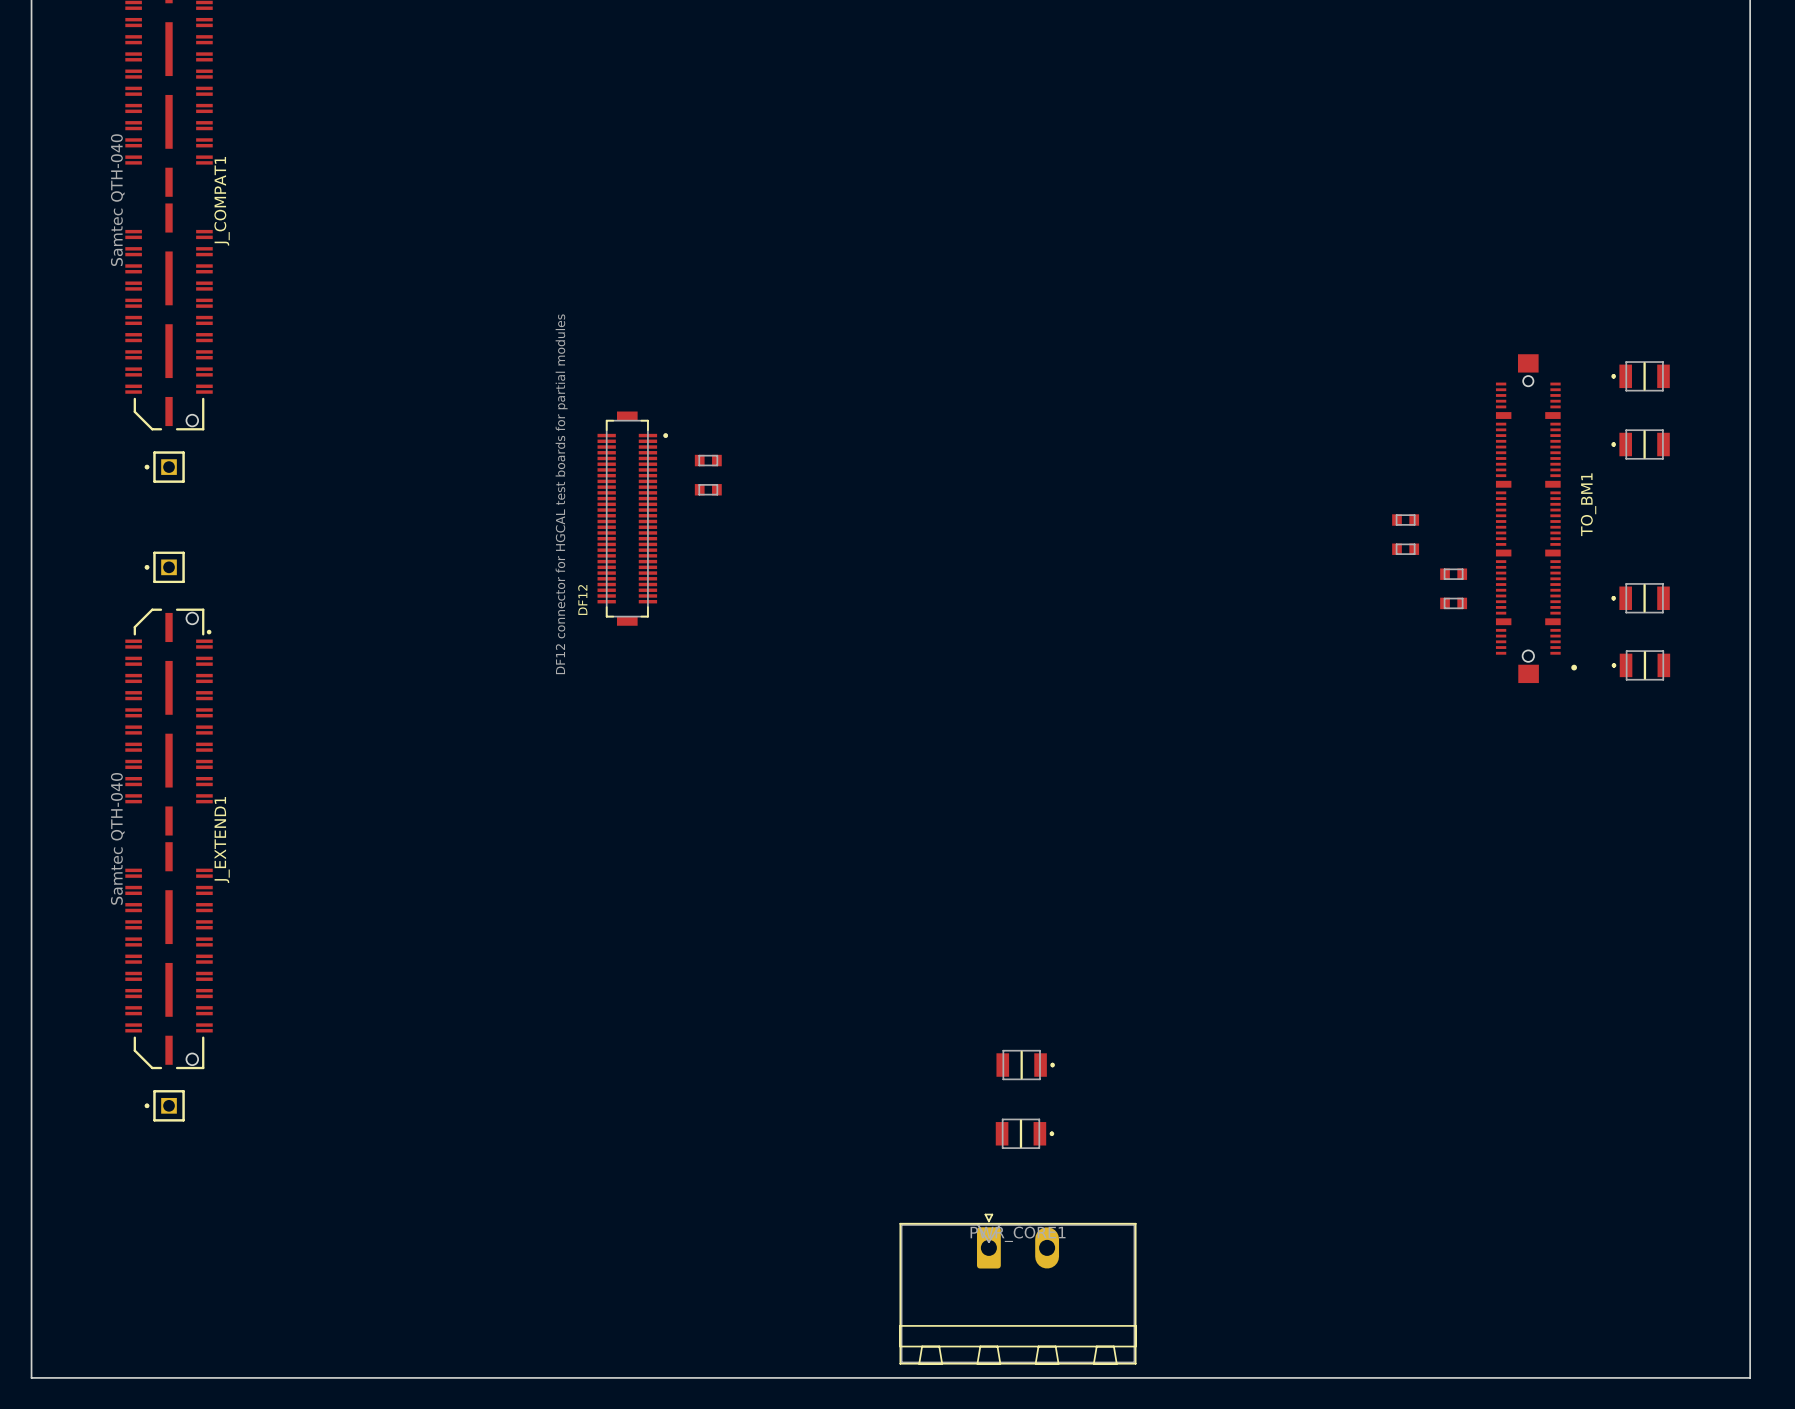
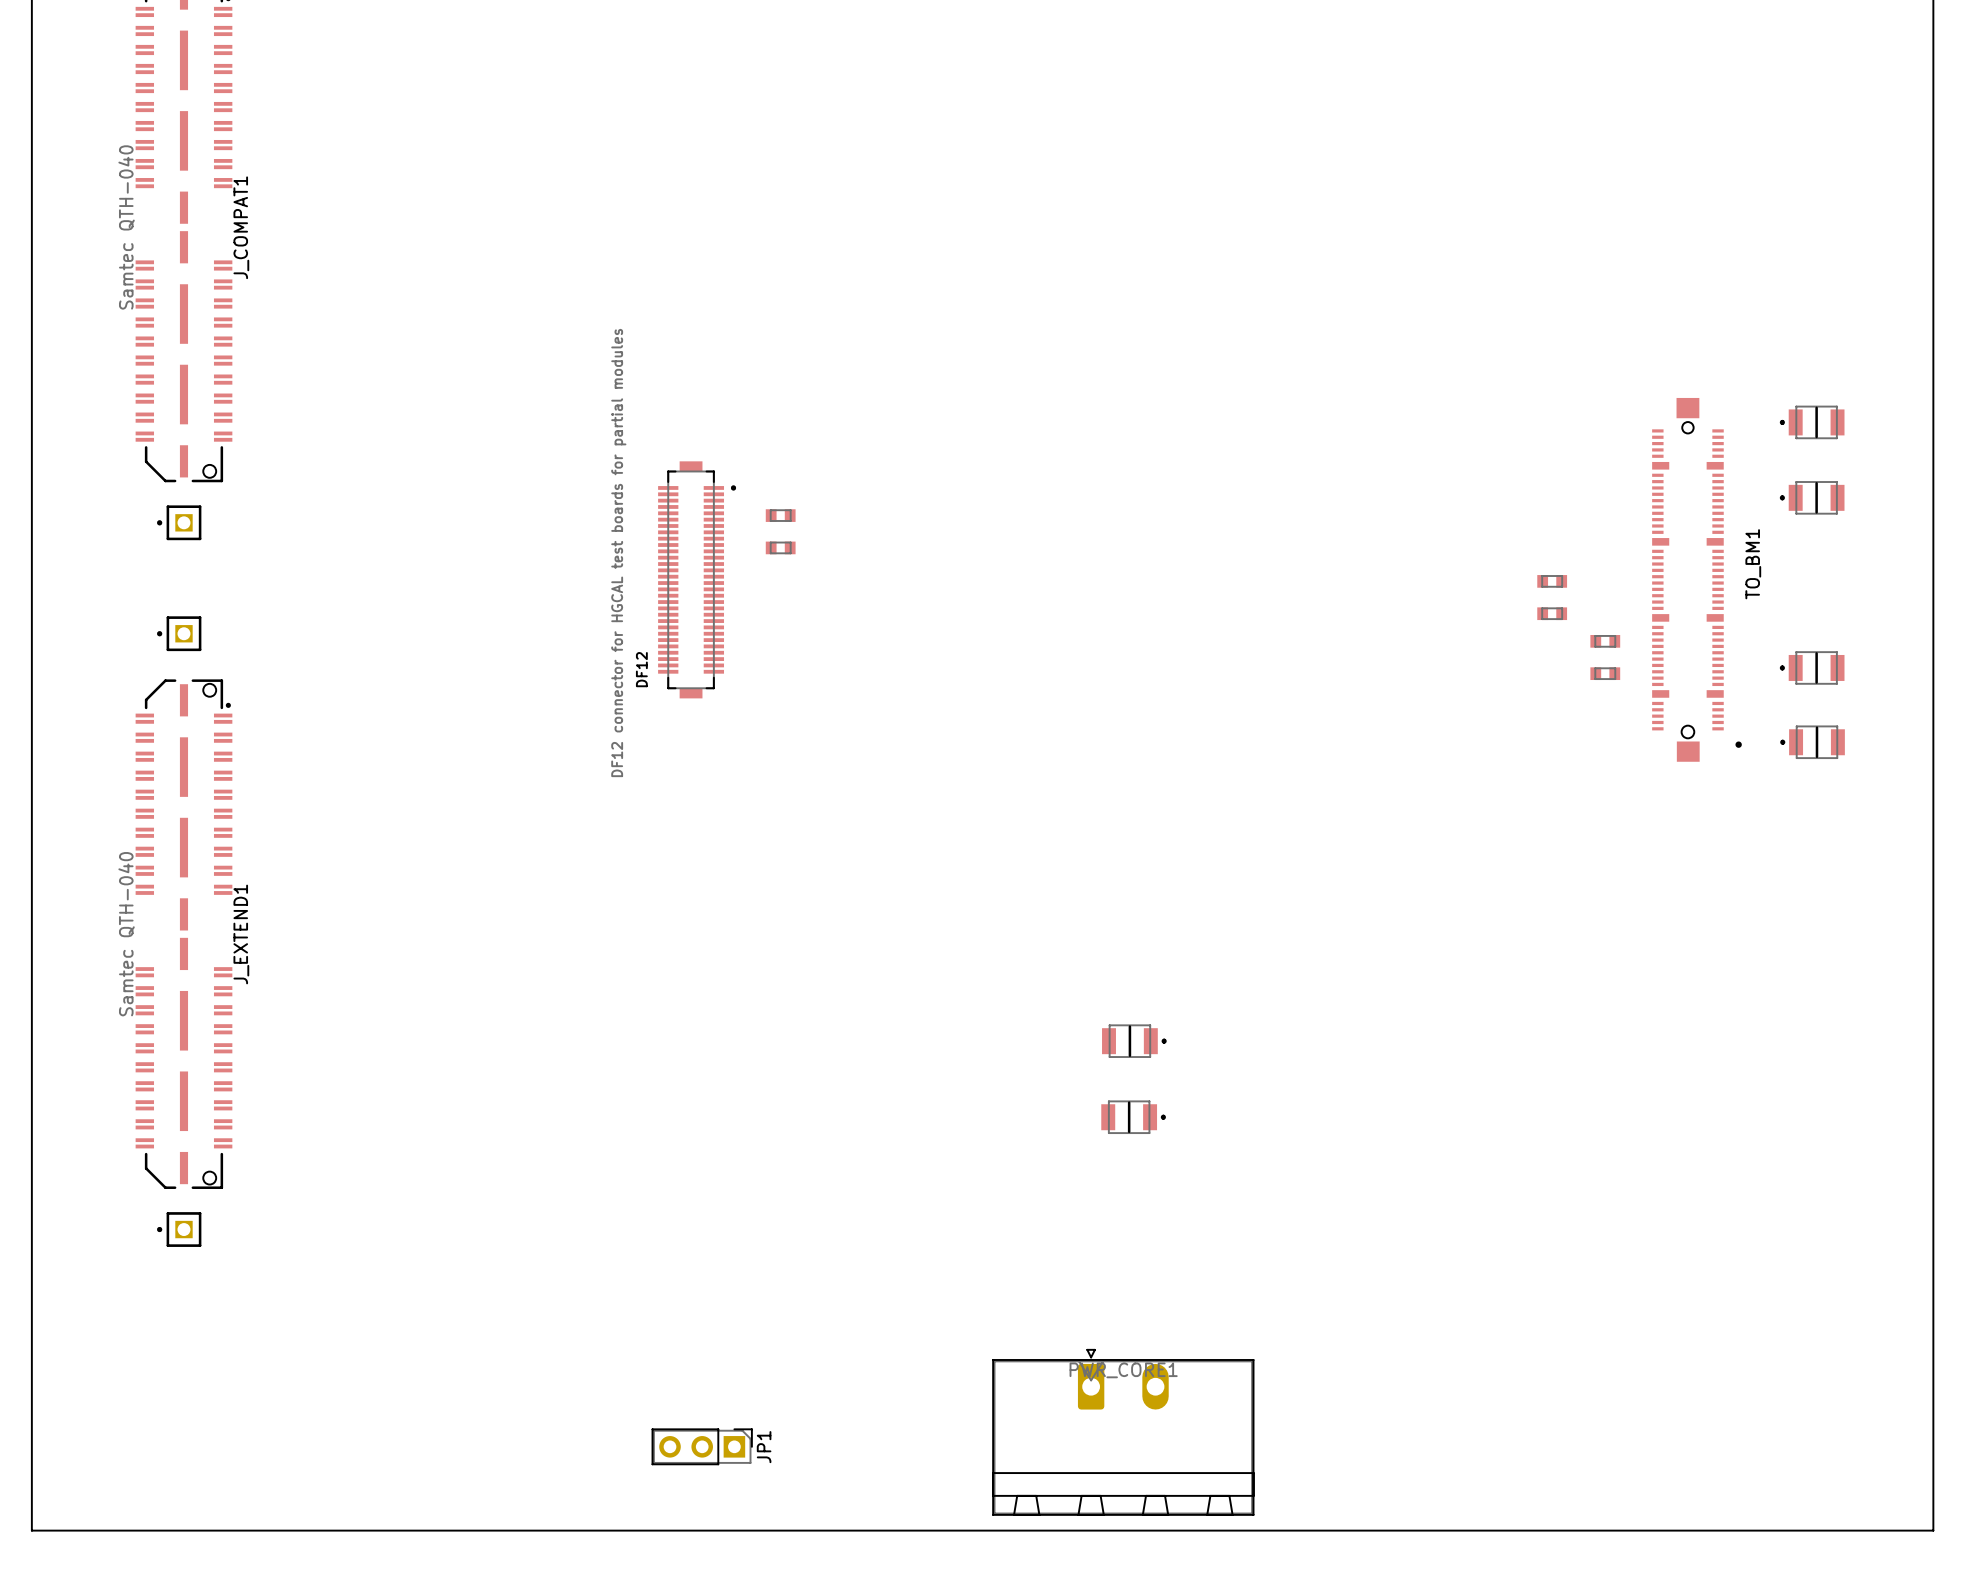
part: none -> (1134, 1041)
part position: (1025, 1065) -> (1133, 1117)
part: (1024, 1133) -> none
JP1: none -> (702, 1446)

